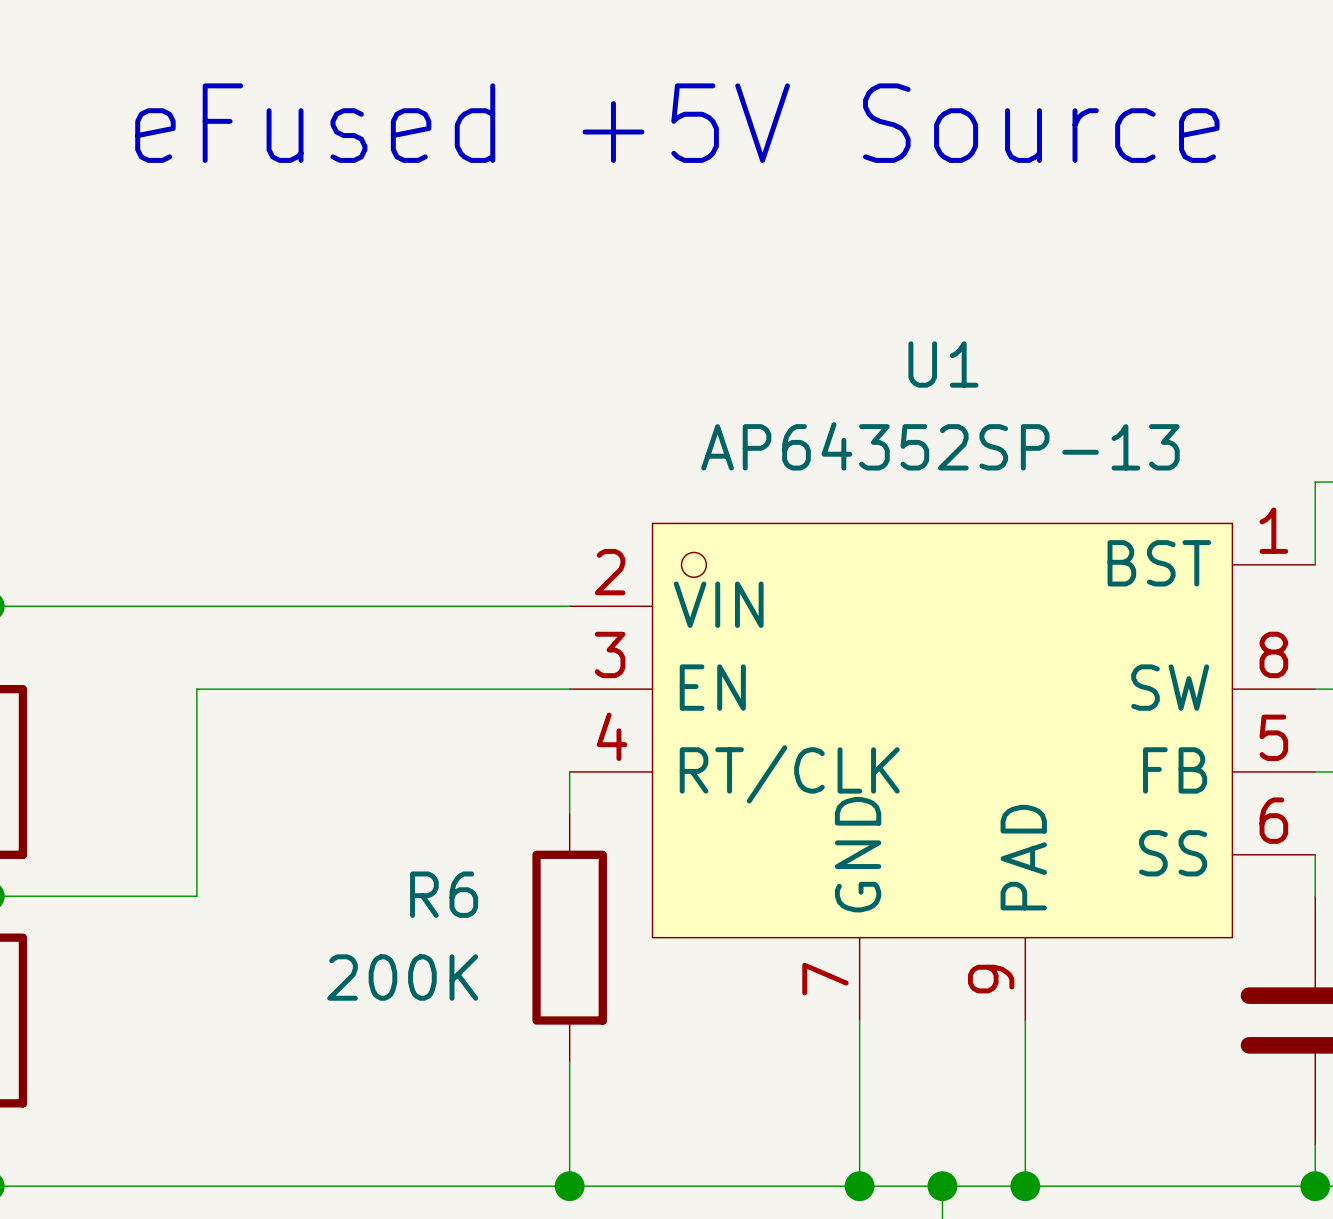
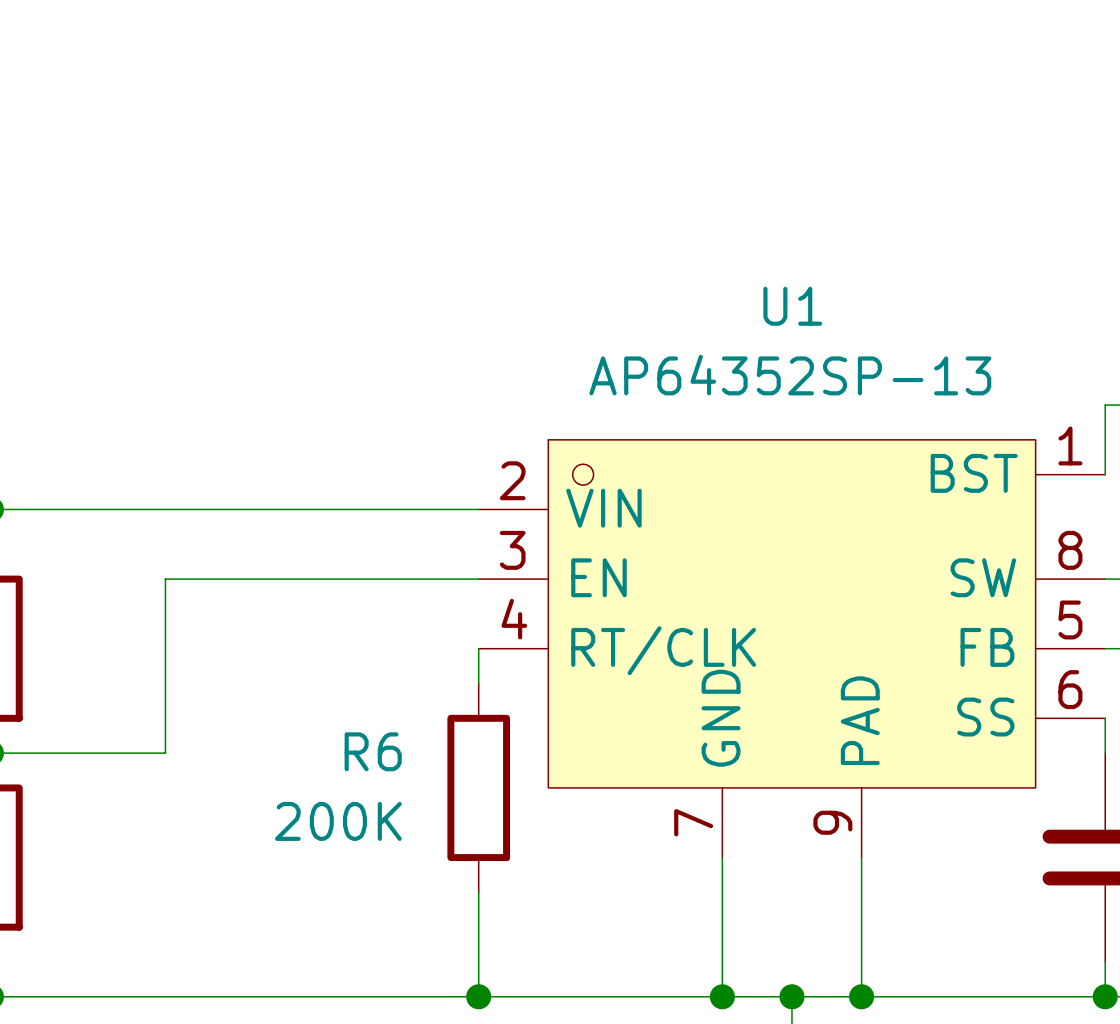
text: eFused +5V Source (677, 123) -> none

